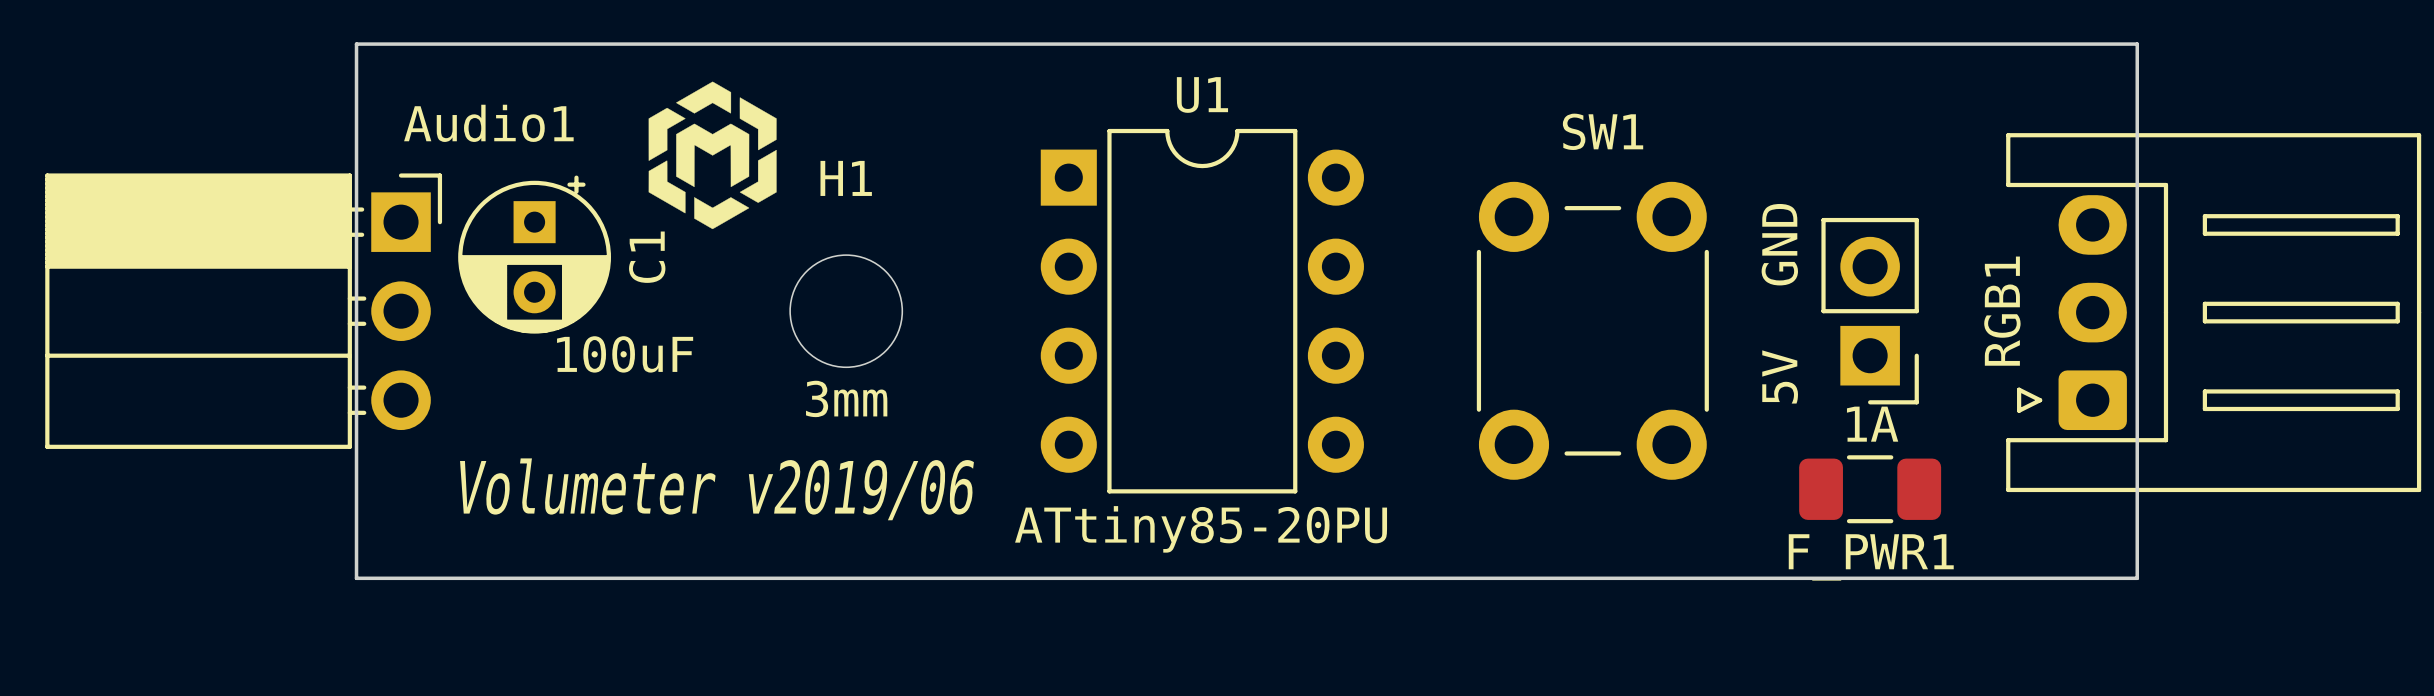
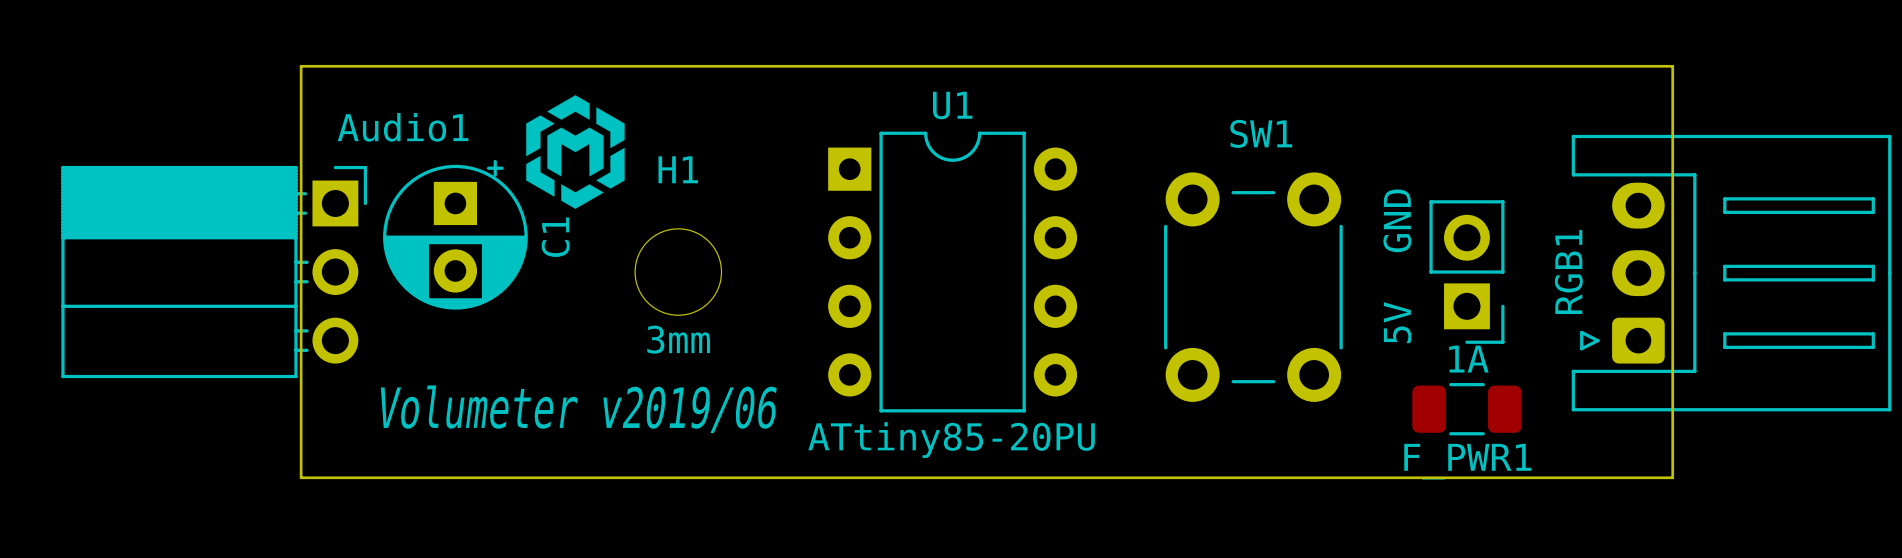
C1 footprint: [458, 175, 612, 334] -> [383, 159, 528, 310]
C1 value: 100uF (625, 354) -> none

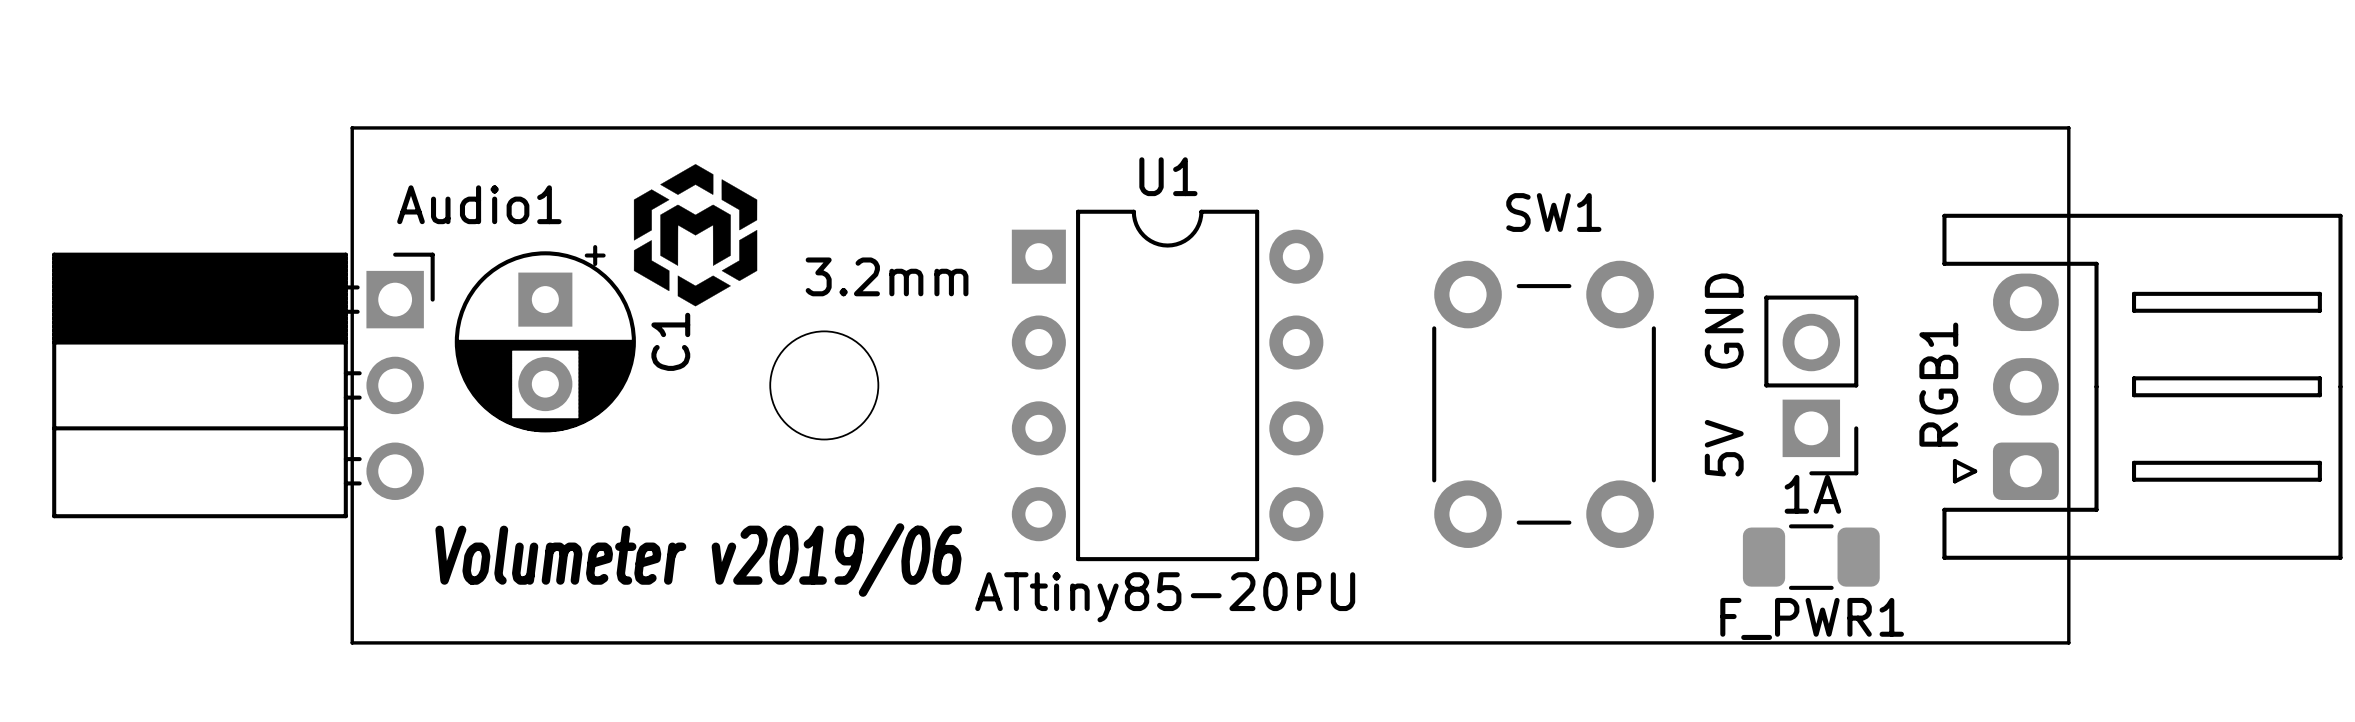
H1 name: H1 (678, 169) -> none
text: none -> 3.2mm (887, 276)
text: 3mm (678, 339) -> none

